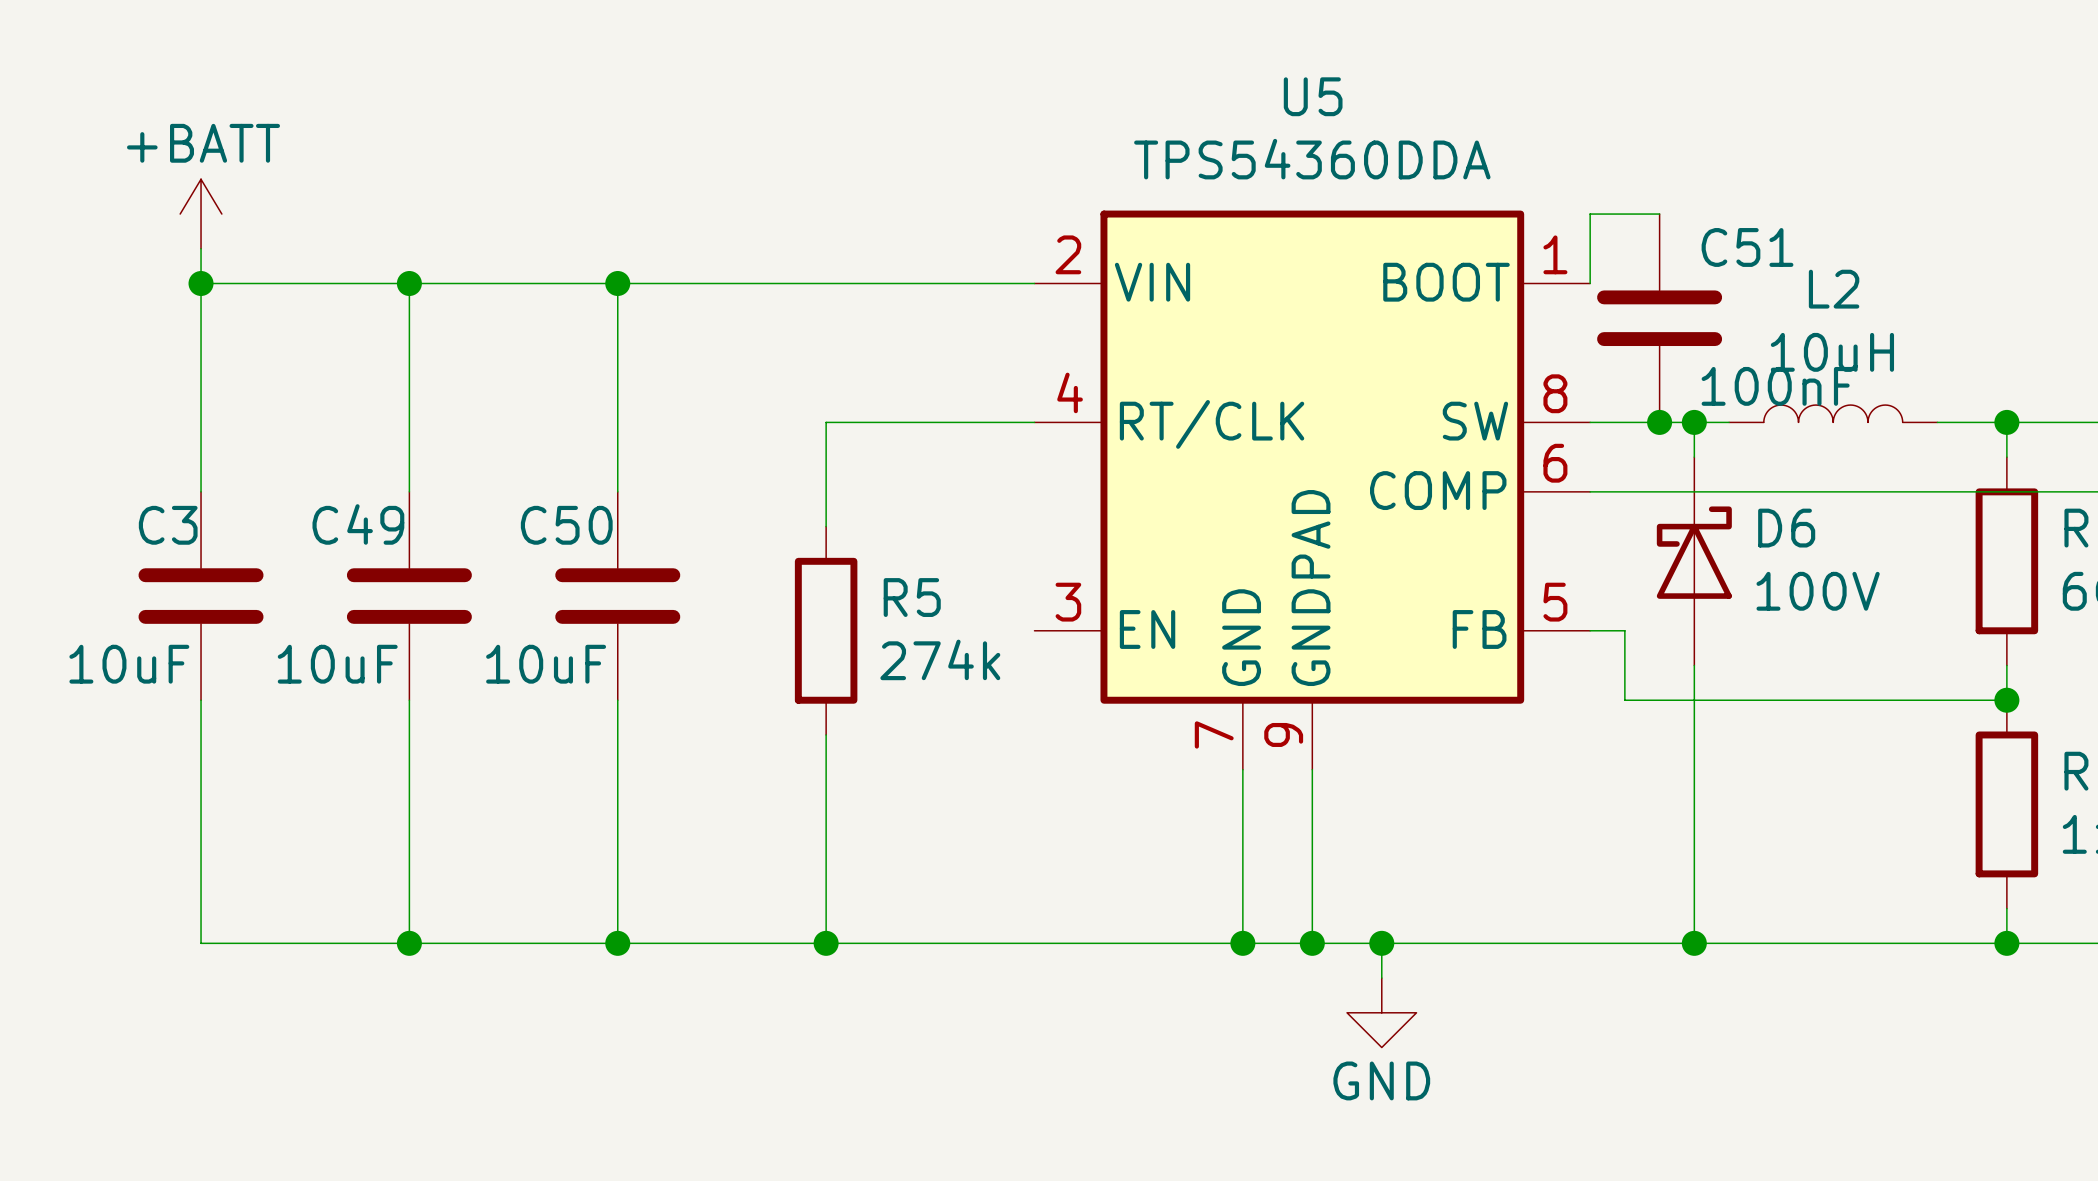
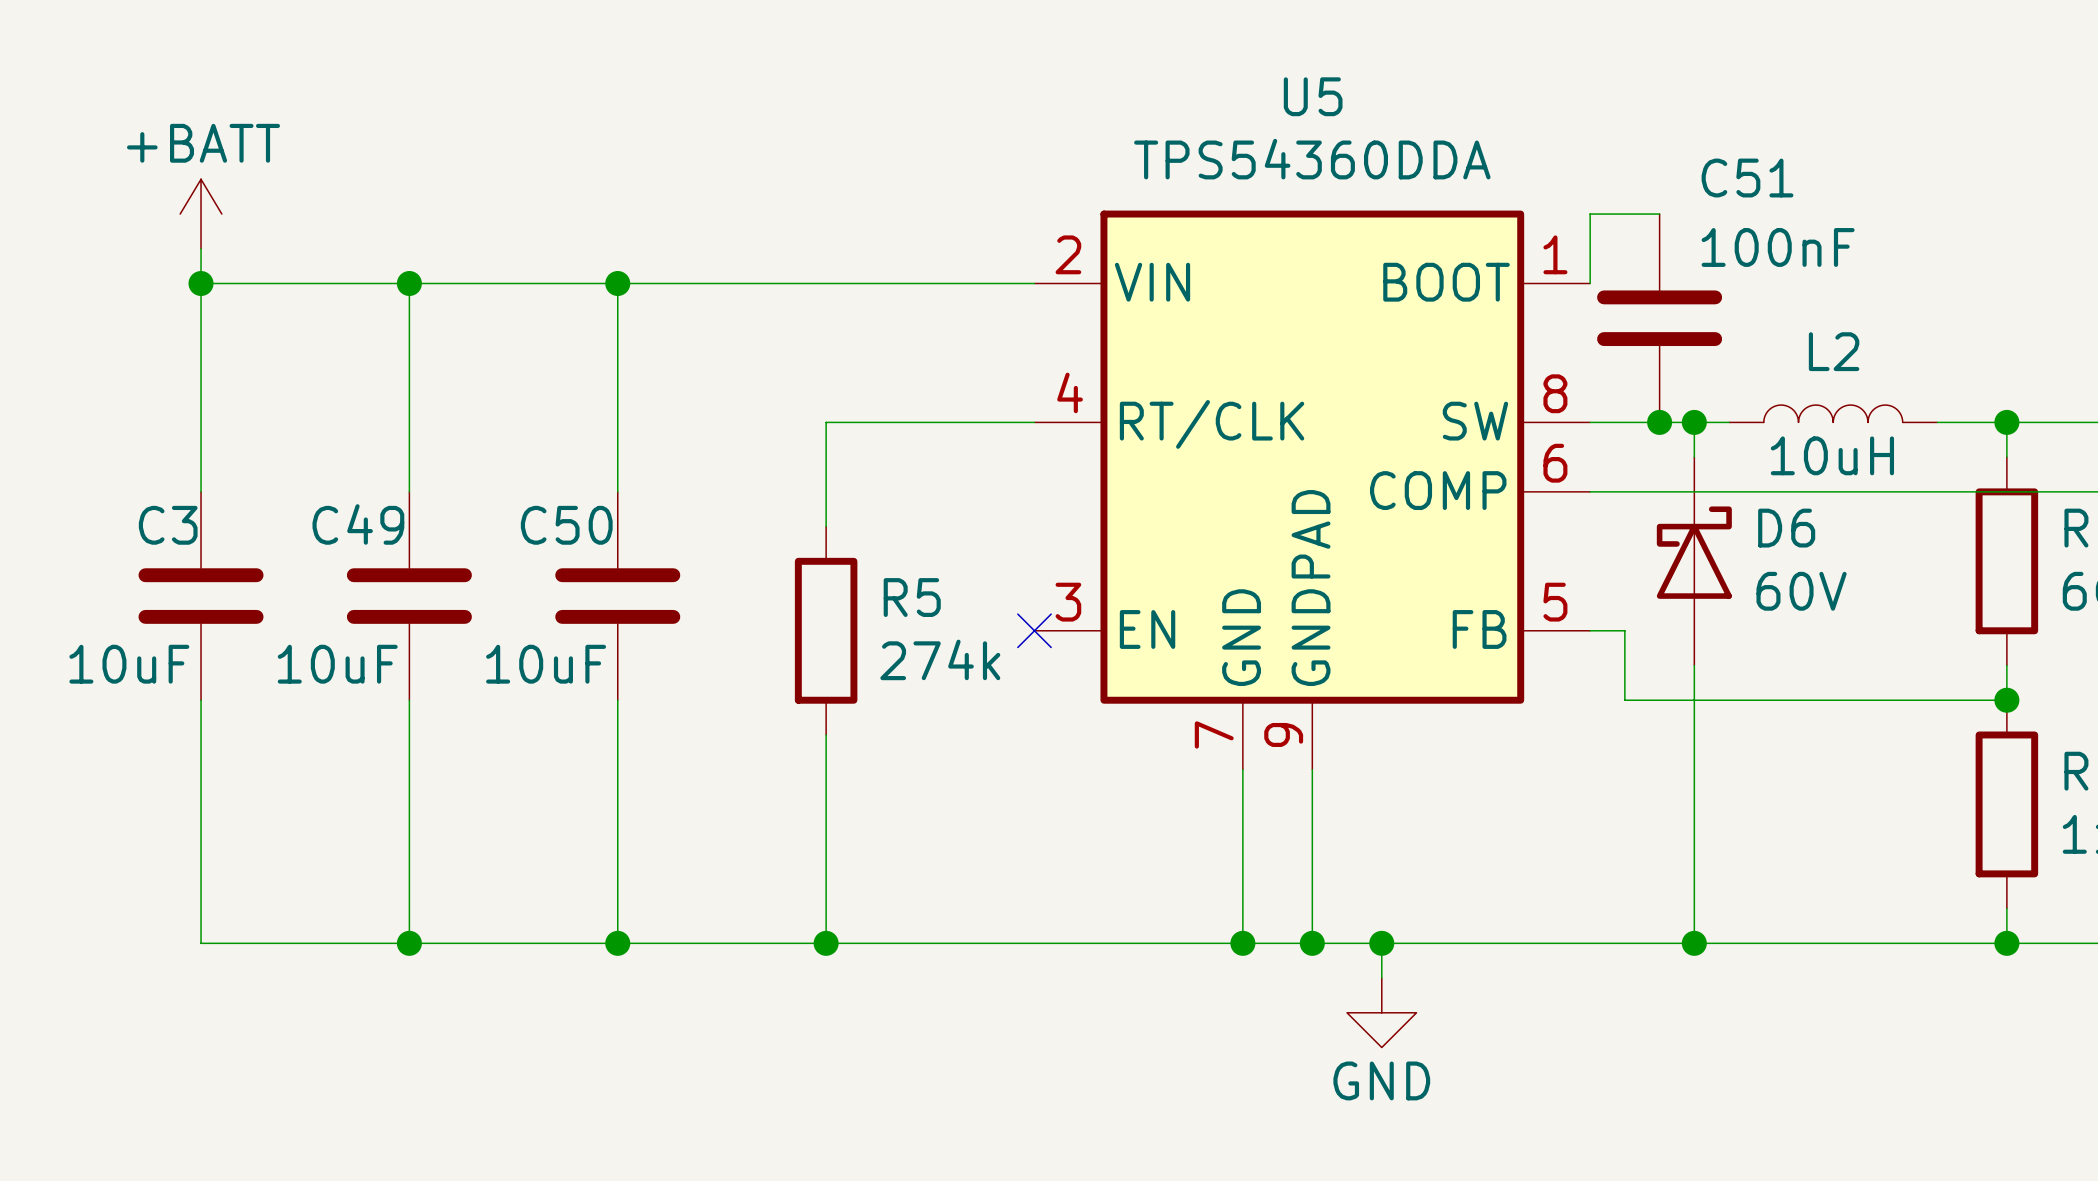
C51 name position: C51 (1747, 247) -> C51 (1747, 178)
L2 name position: L2 (1834, 289) -> L2 (1834, 351)
L2 value position: 10uH (1832, 352) -> 10uH (1832, 455)
C51 value position: 100nF (1778, 386) -> 100nF (1778, 247)
D6 value: 100V (1818, 591) -> 60V (1801, 591)
no-connect mark: none -> (1034, 630)

